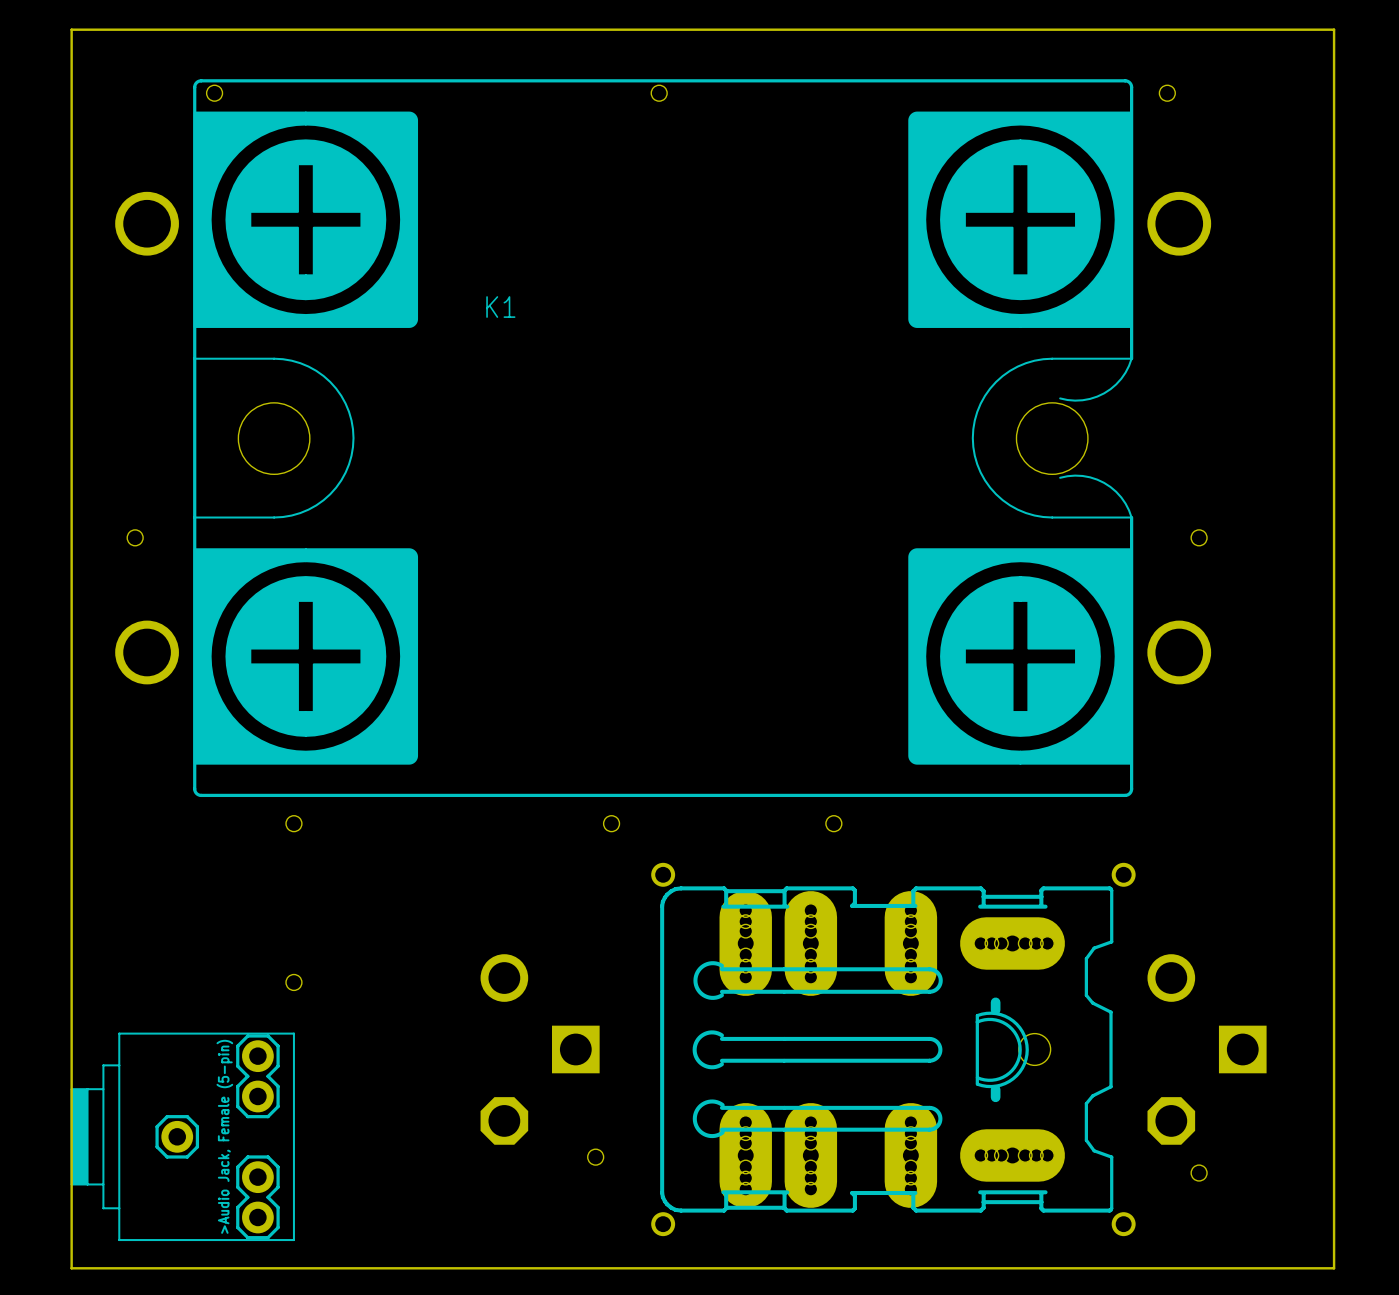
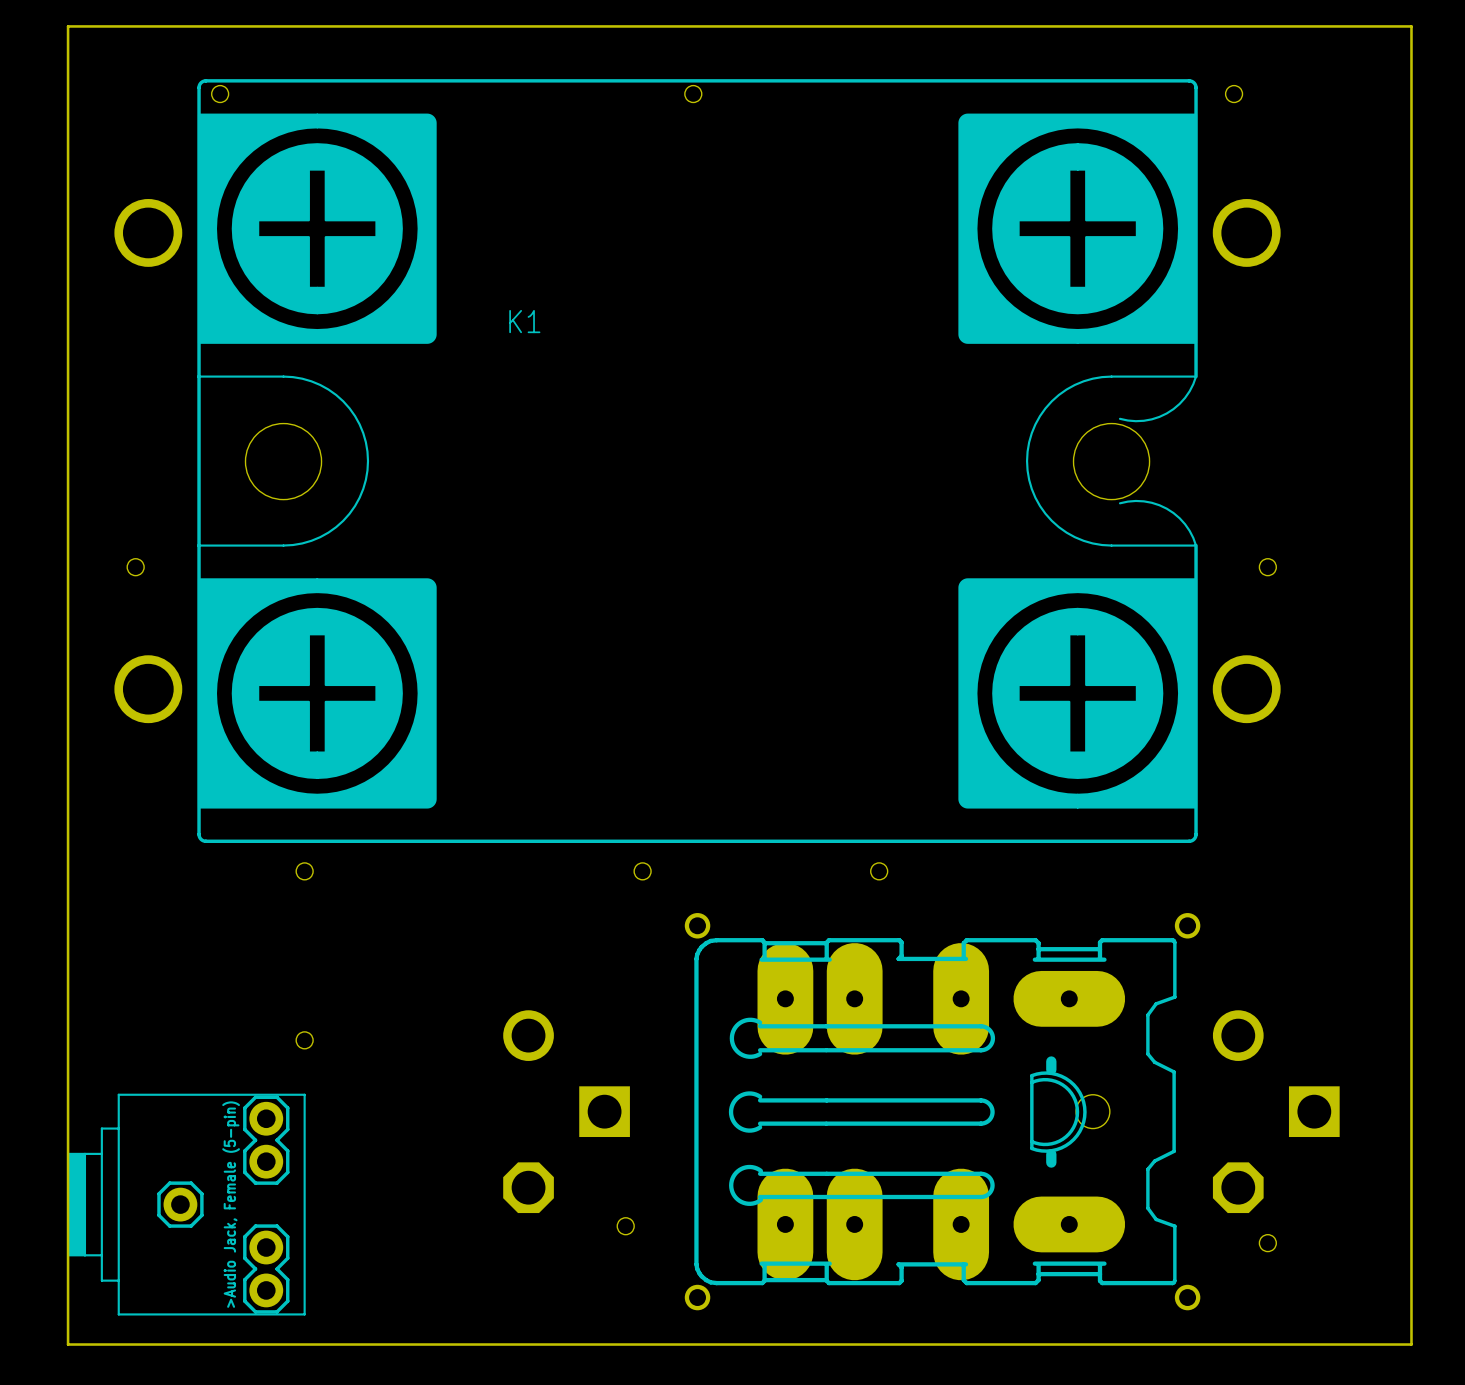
part footprint: [651, 862, 1136, 1237] -> [684, 913, 1201, 1311]

